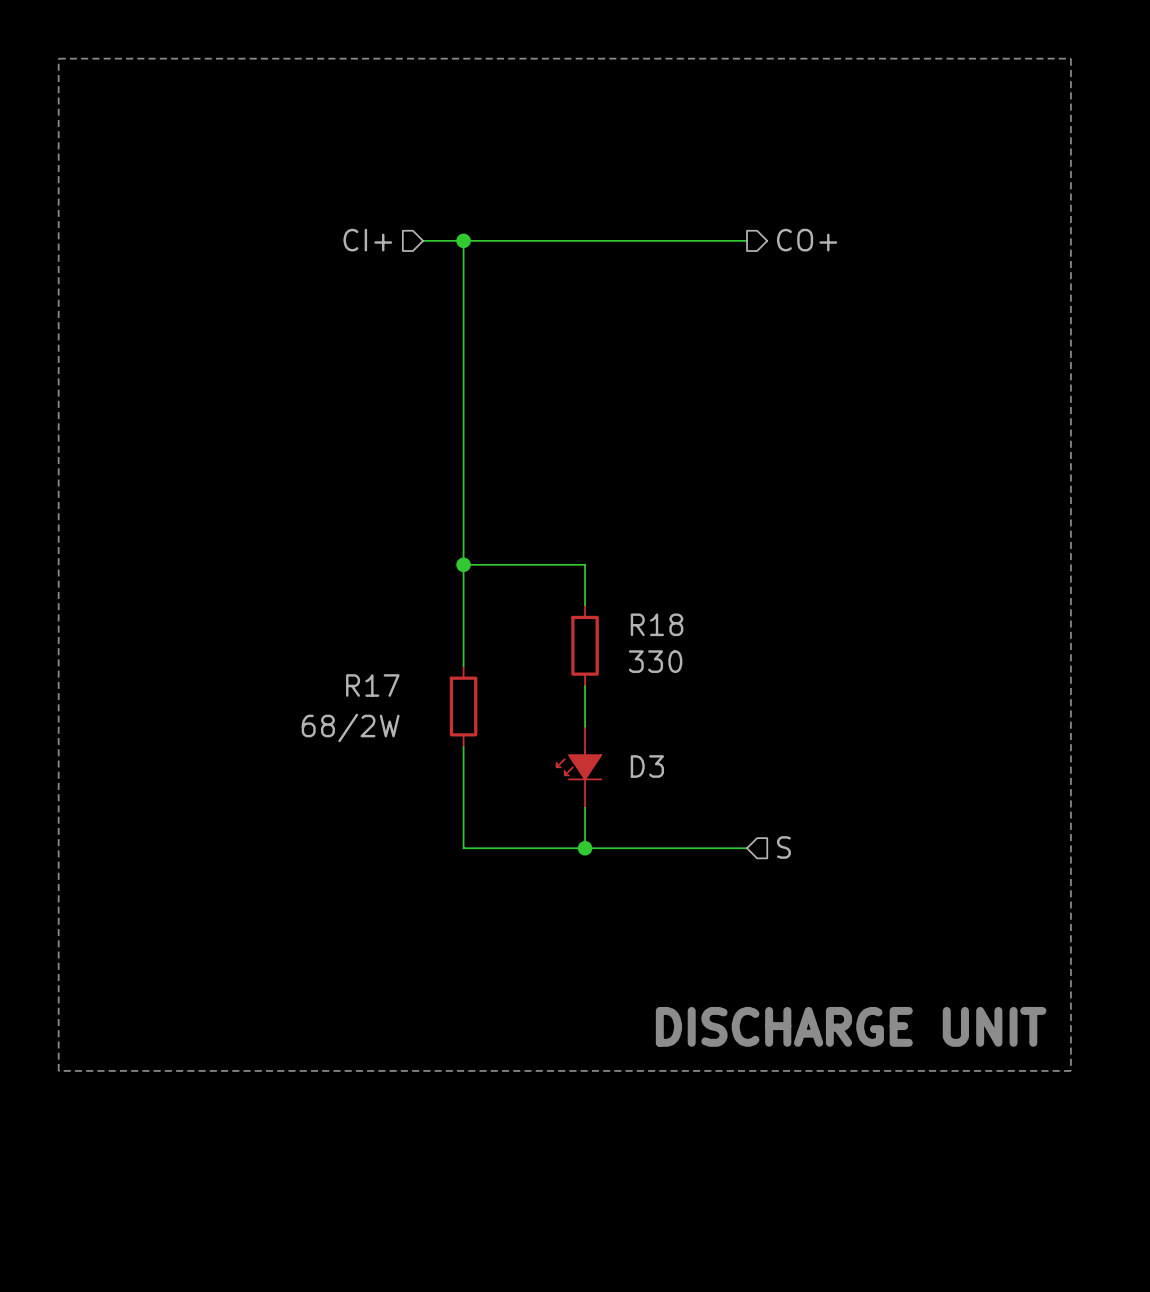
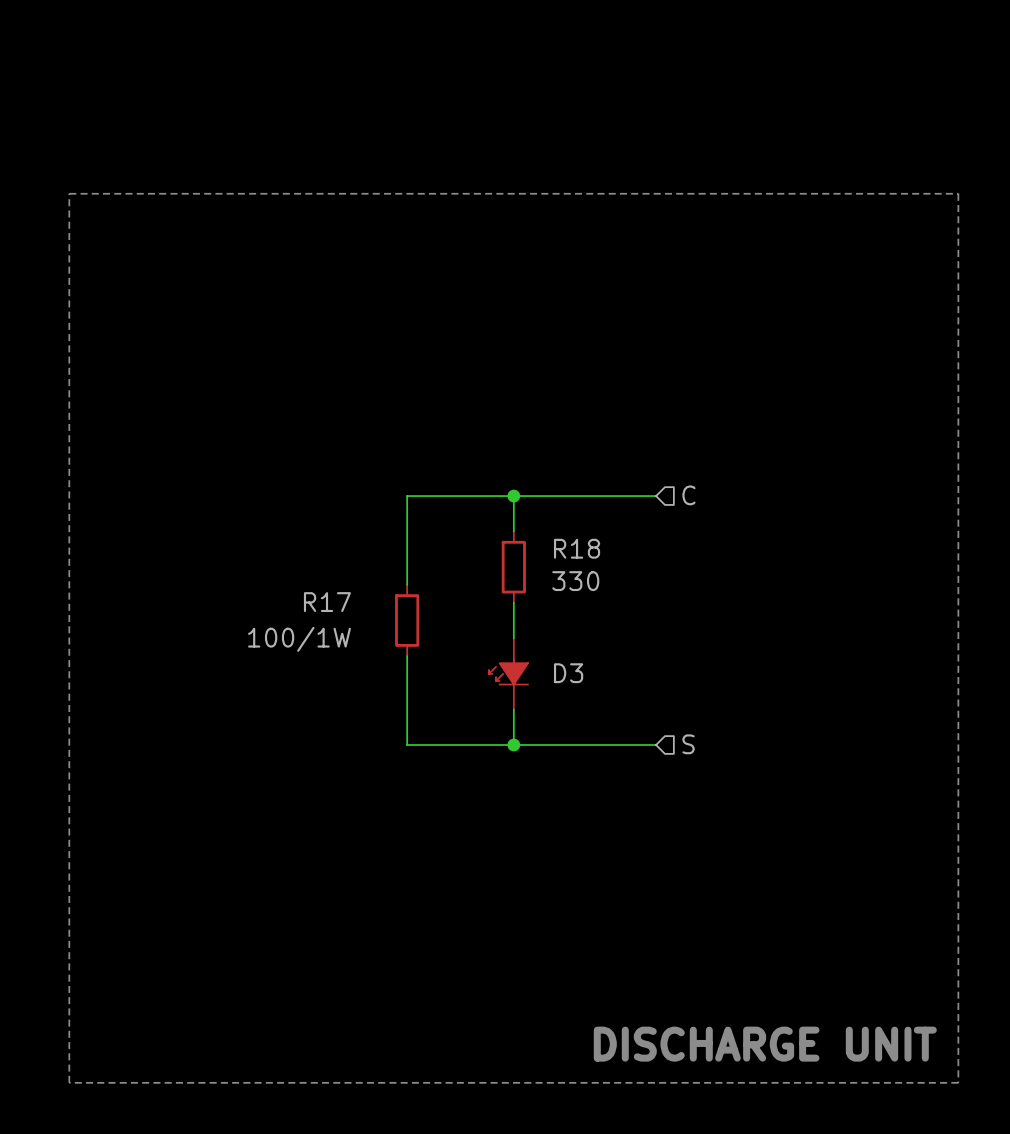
line: (58, 58) (1070, 58) (1070, 1070) (58, 1070) (58, 58) -> (69, 193) (958, 193) (958, 1082) (69, 1082) (69, 193)
hierarchical label: CI+ (367, 240) -> none
wire: (423, 240) (747, 240) -> none
wire: (463, 240) (463, 564) -> none
junction: (463, 240) -> none
hierarchical label: CO+ (807, 240) -> none
junction: (463, 564) -> none
wire: none -> (513, 496) (656, 496)
junction: none -> (513, 496)
hierarchical label: none -> C (688, 495)
R17 value: 68/2W (350, 727) -> 100/1W (299, 639)
text position: DISCHARGE UNIT (851, 1026) -> DISCHARGE UNIT (765, 1044)

